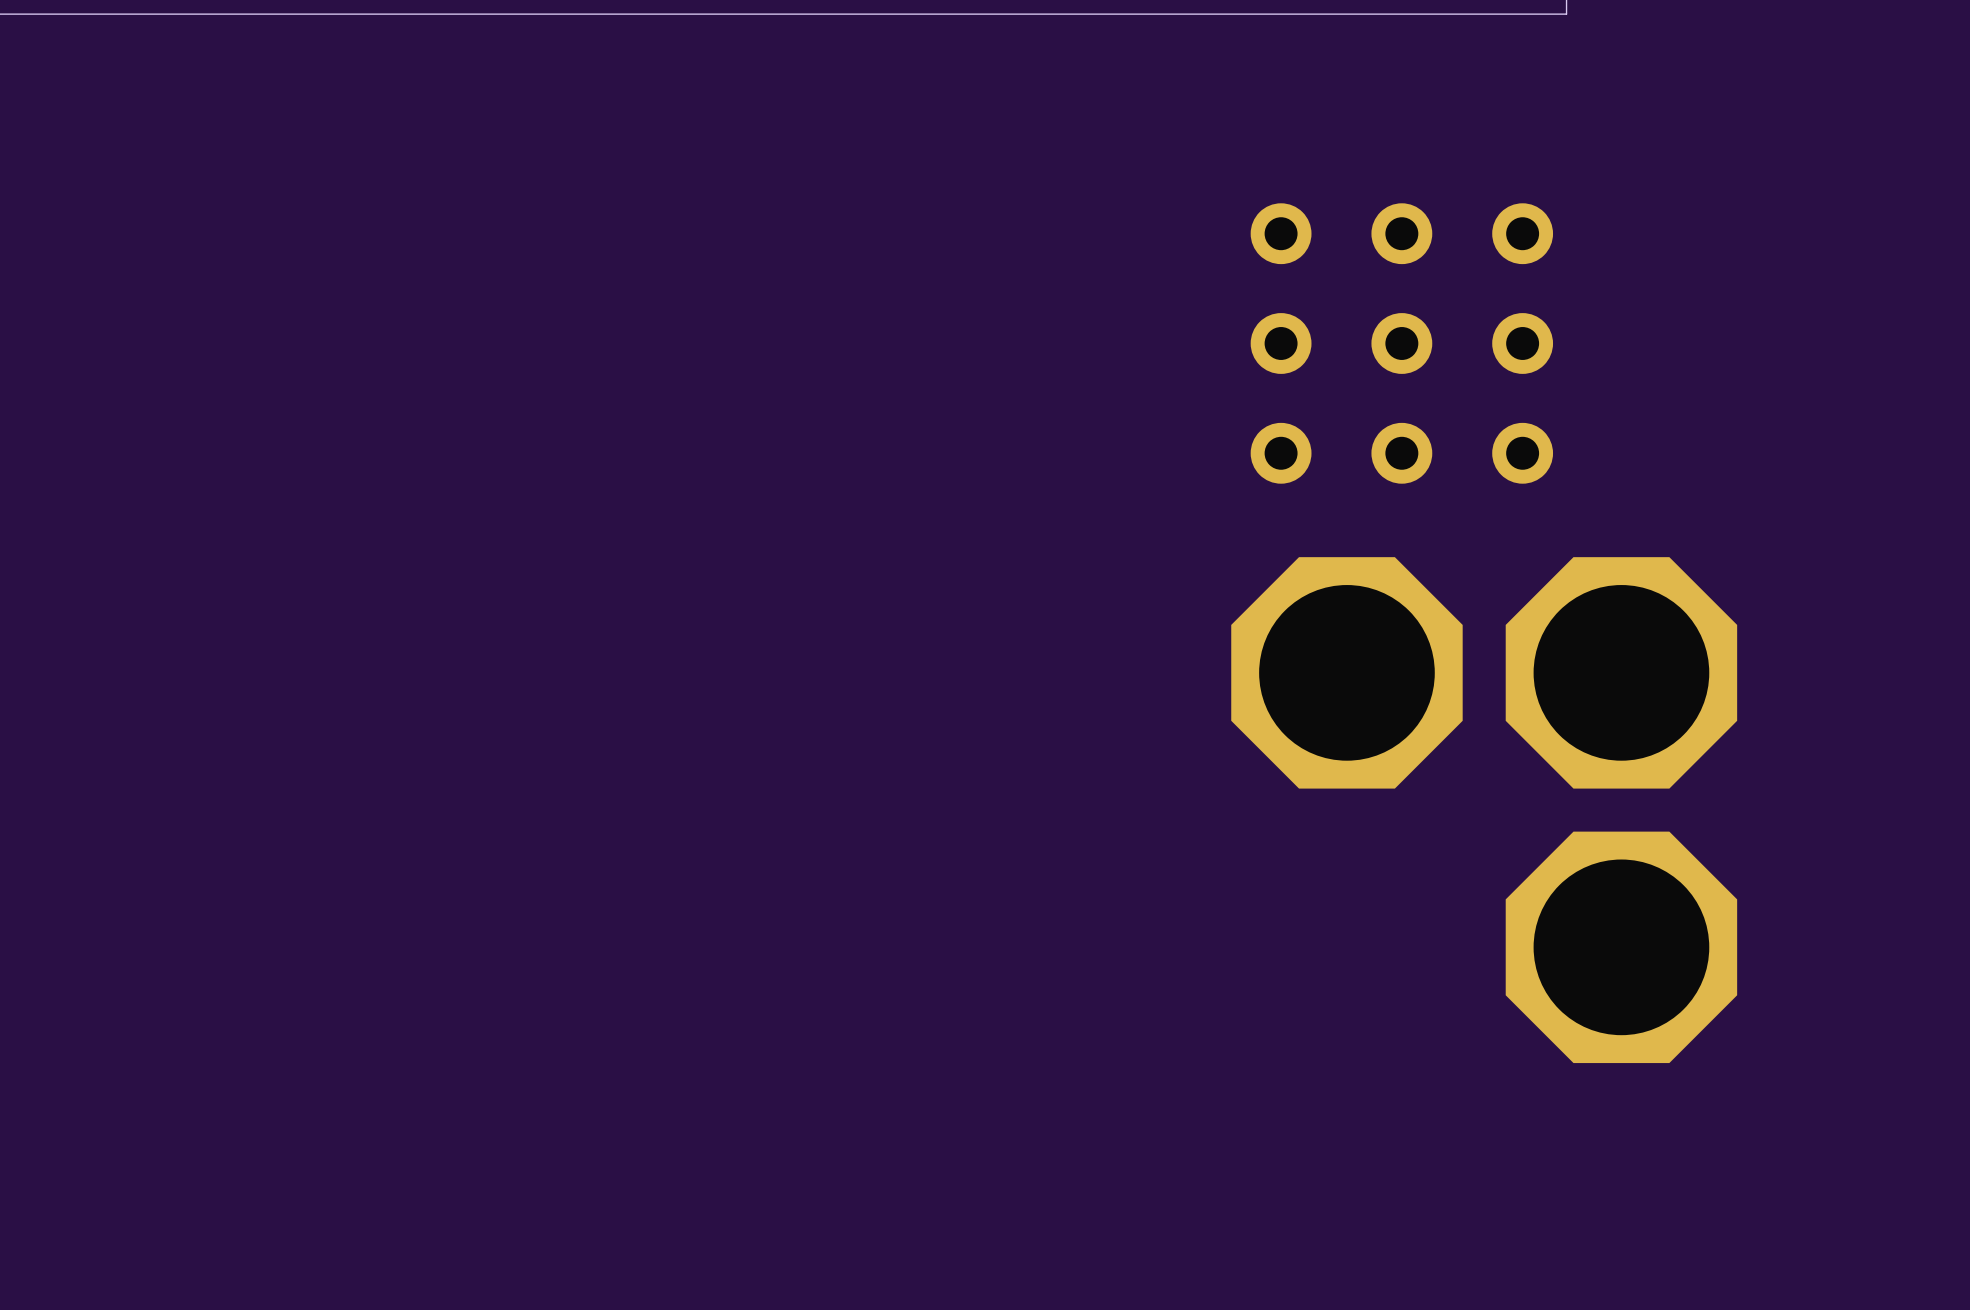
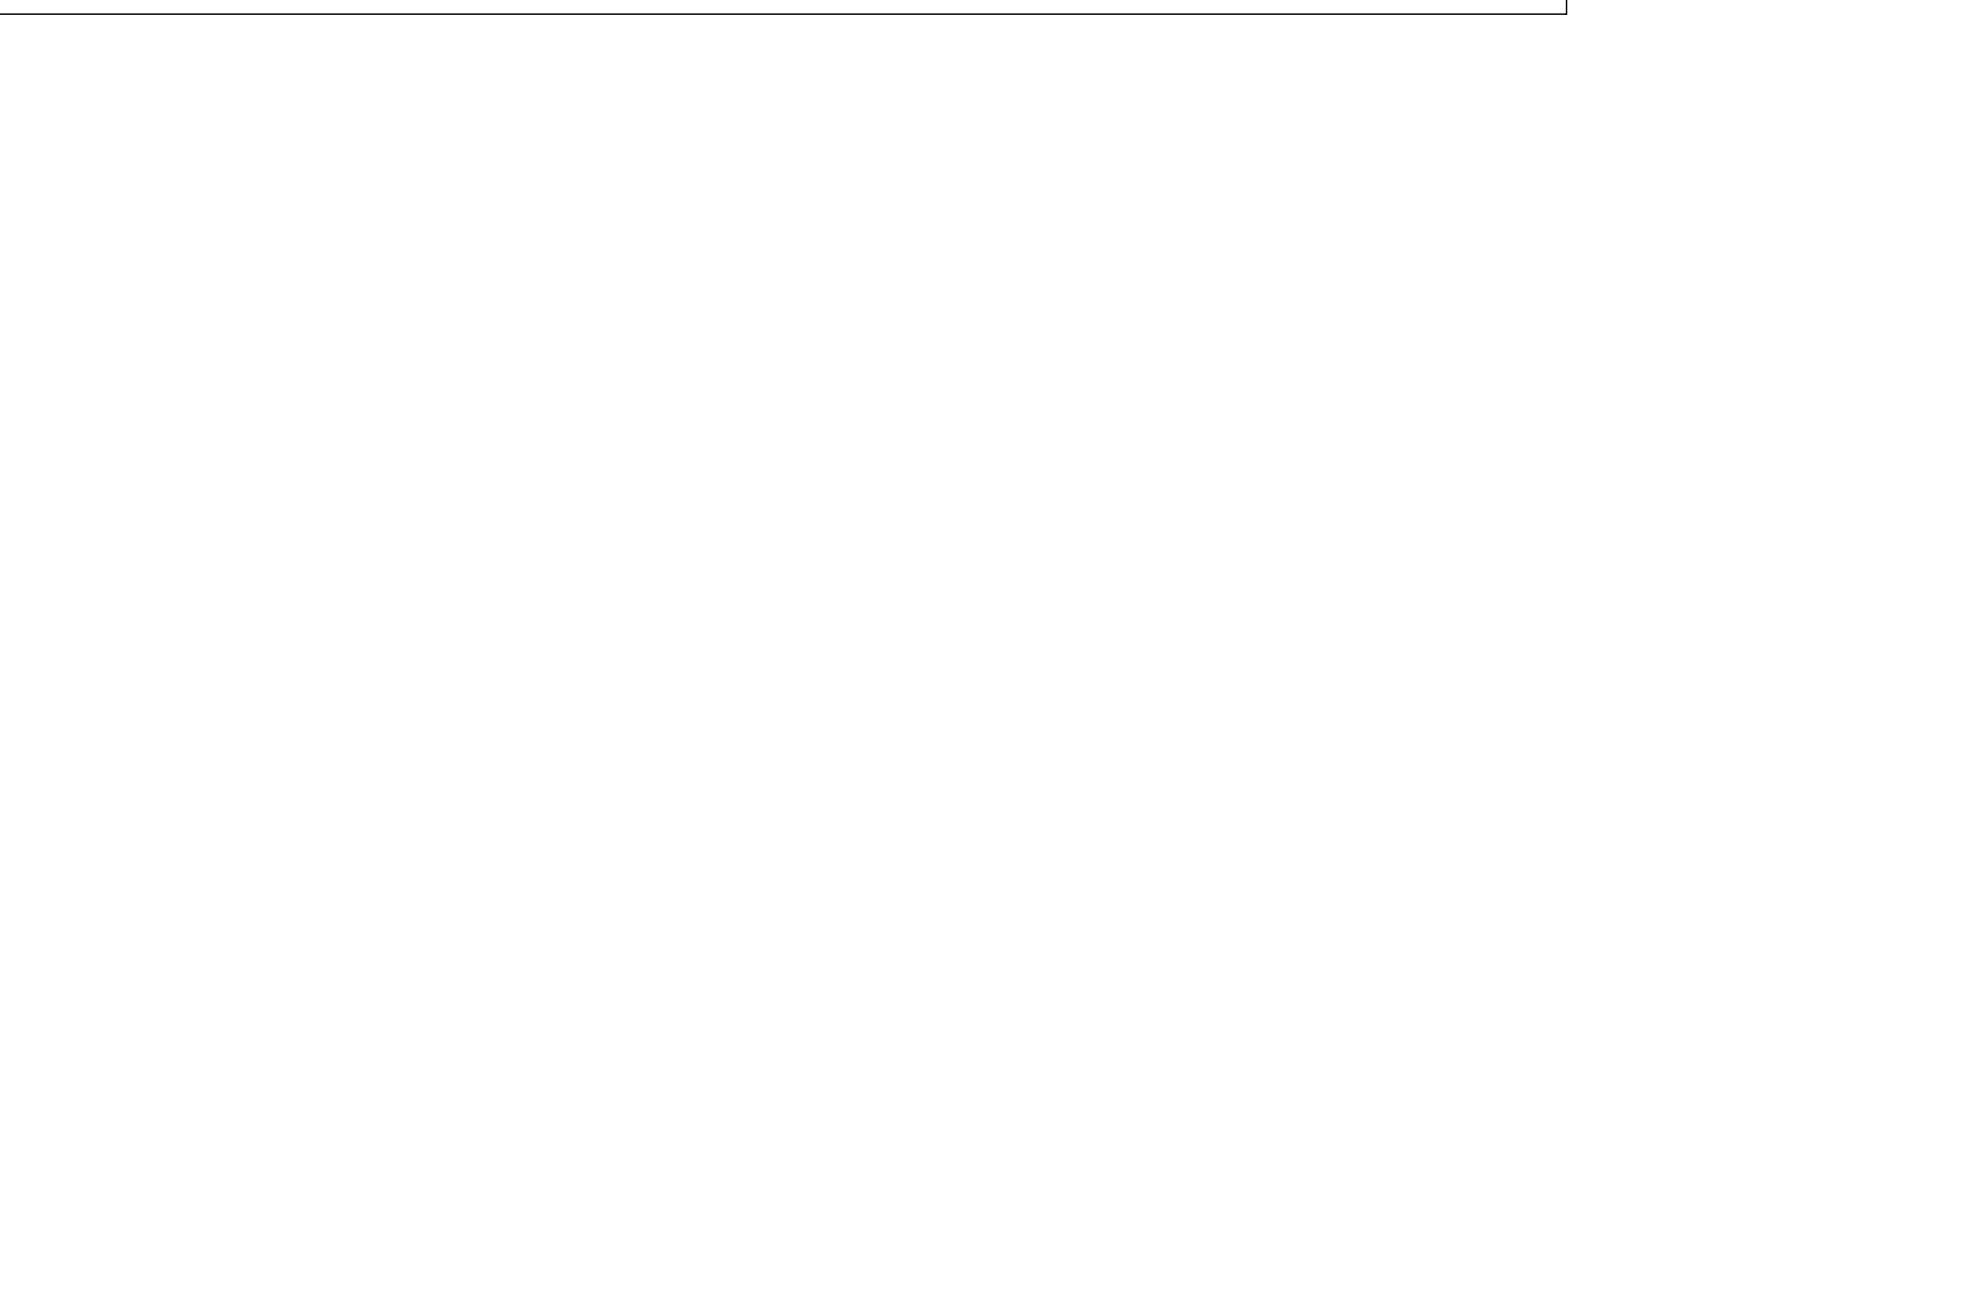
part: (1401, 343) -> none
part: (1346, 672) -> none
part: (1621, 672) -> none
part: (1621, 947) -> none

